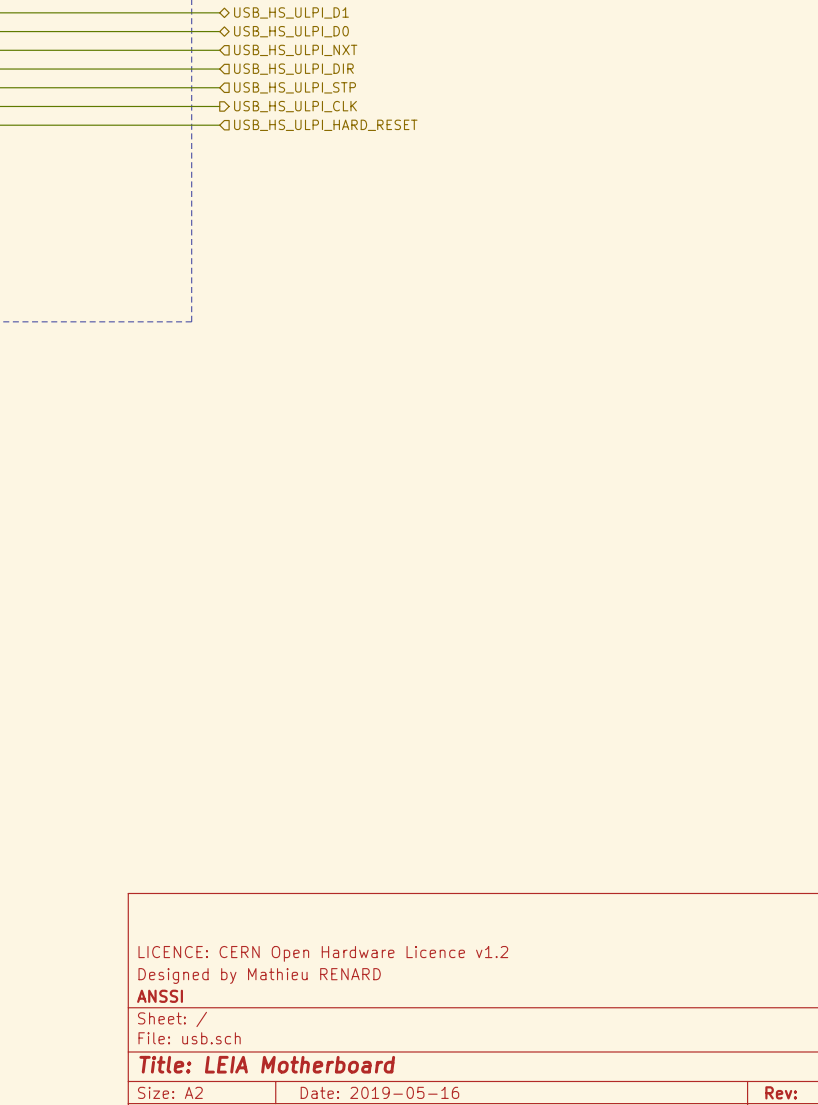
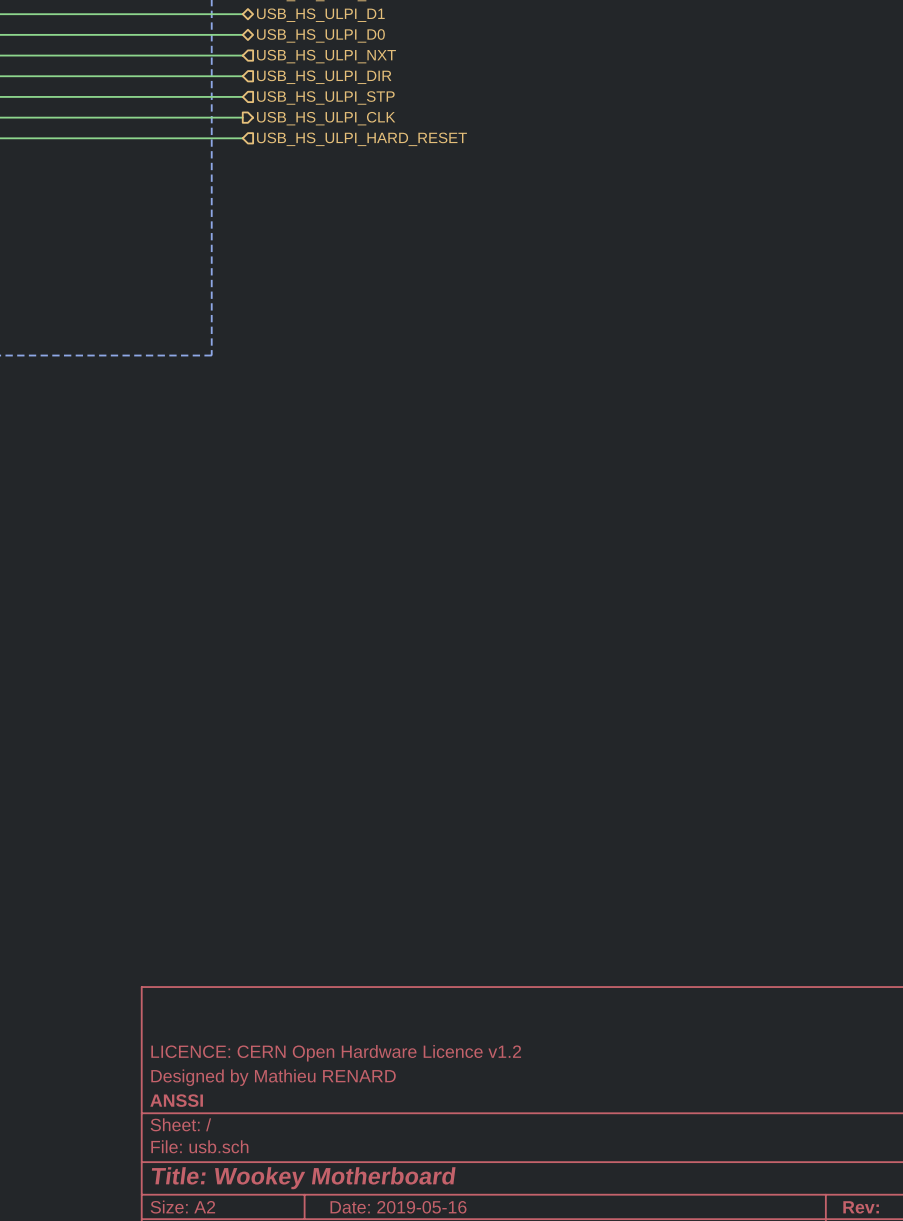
title block: Title: LEIA Motherboard (267, 1064) -> Title: Wookey Motherboard (303, 1178)

